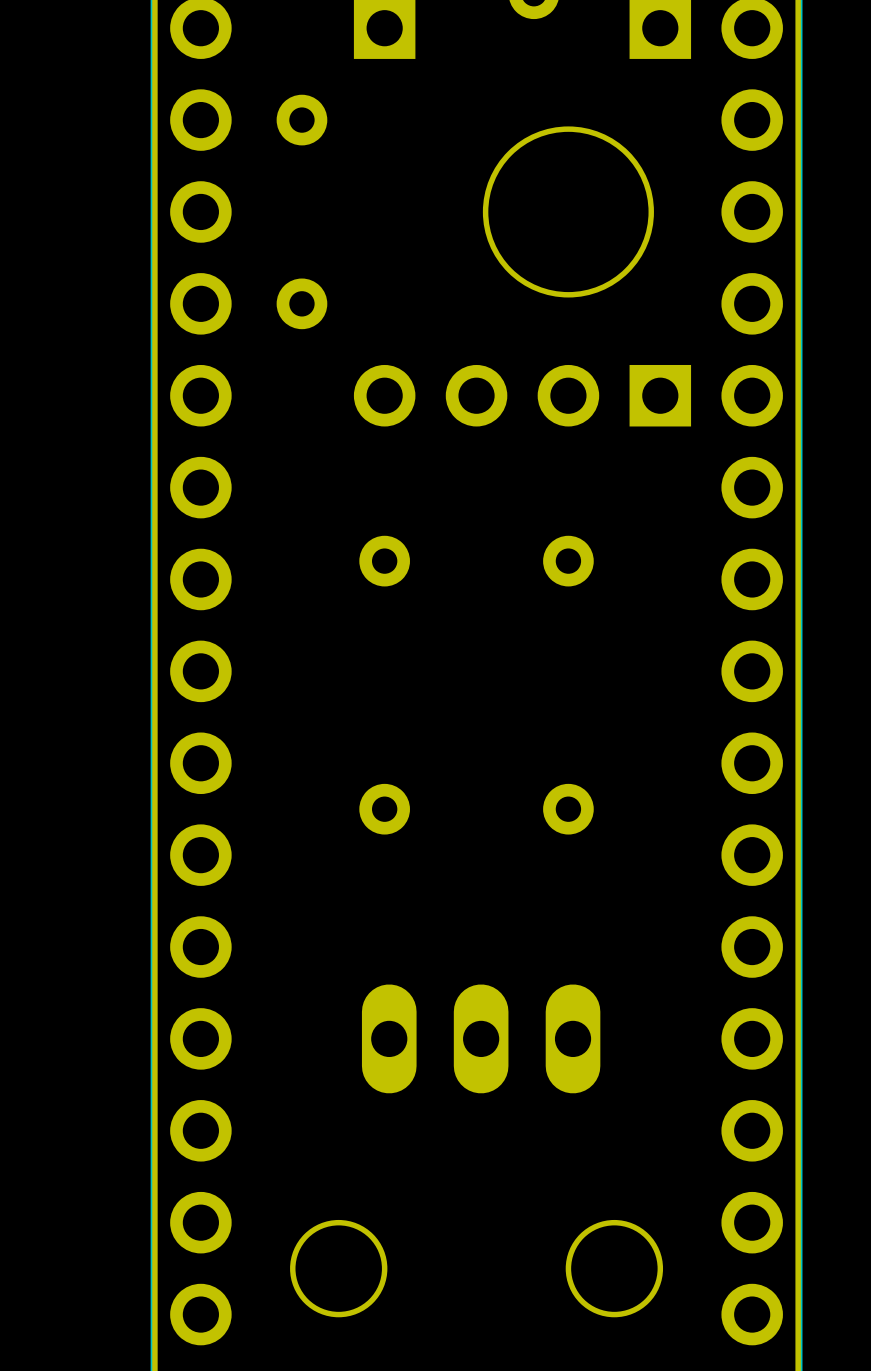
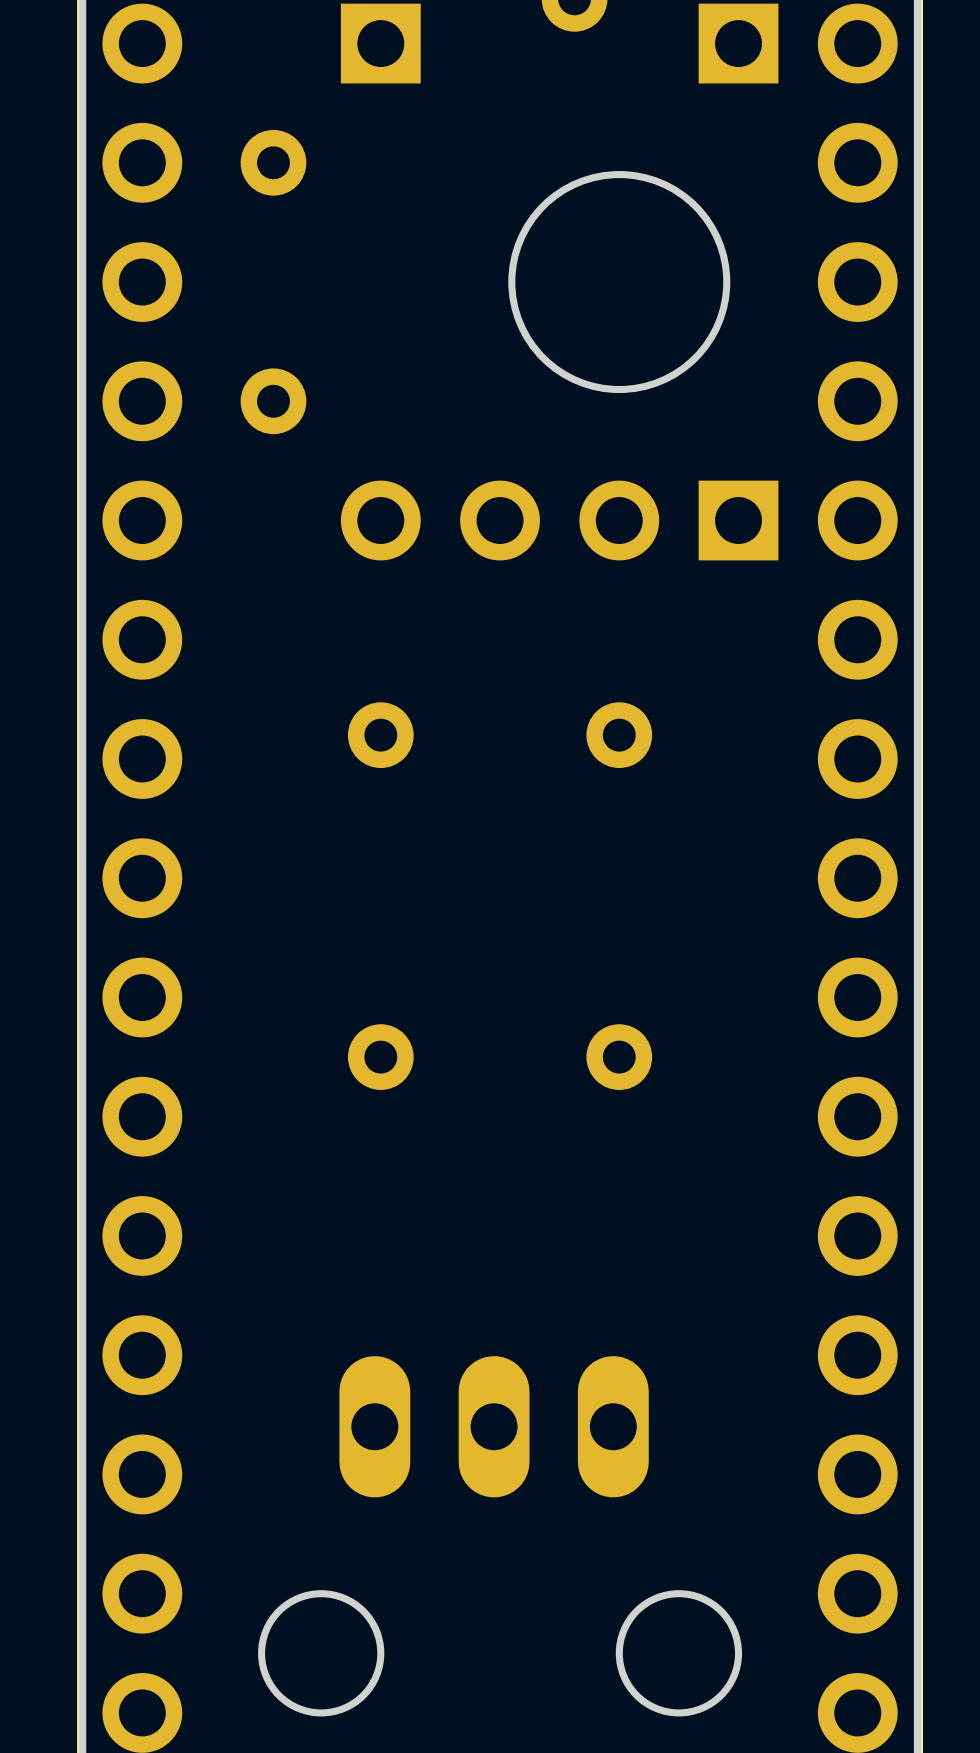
part position: (481, 1038) -> (494, 1426)

